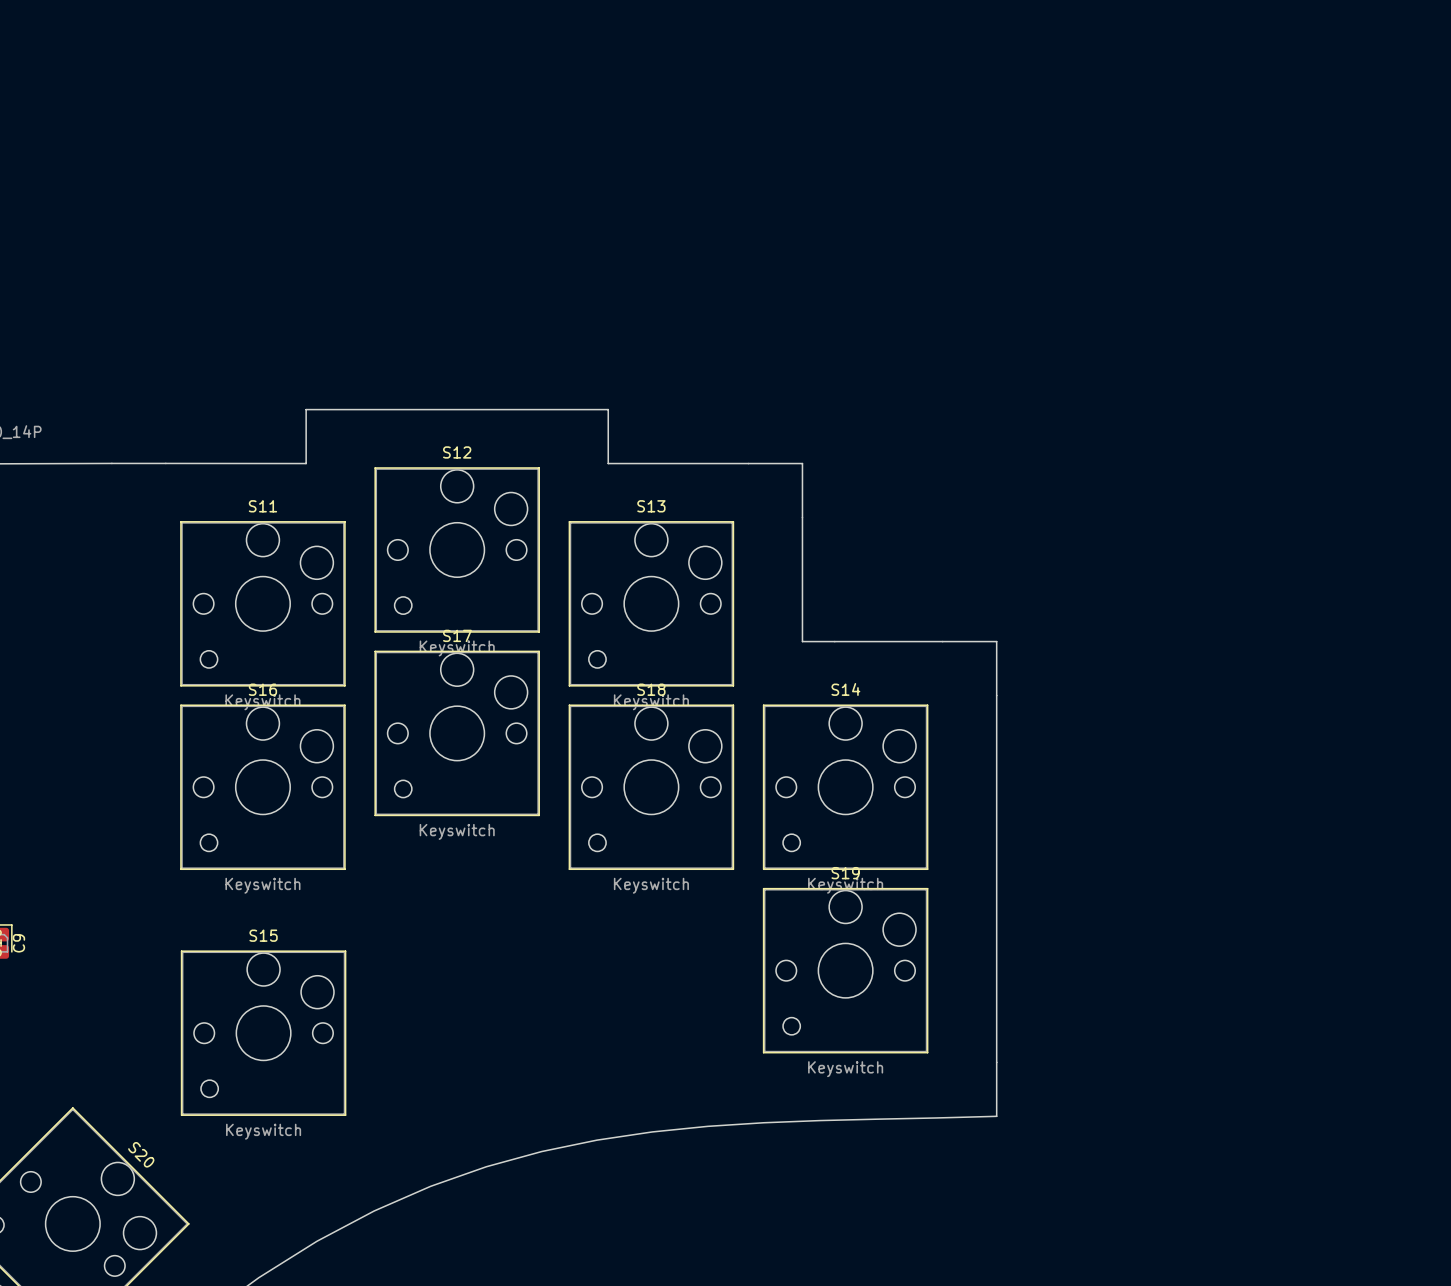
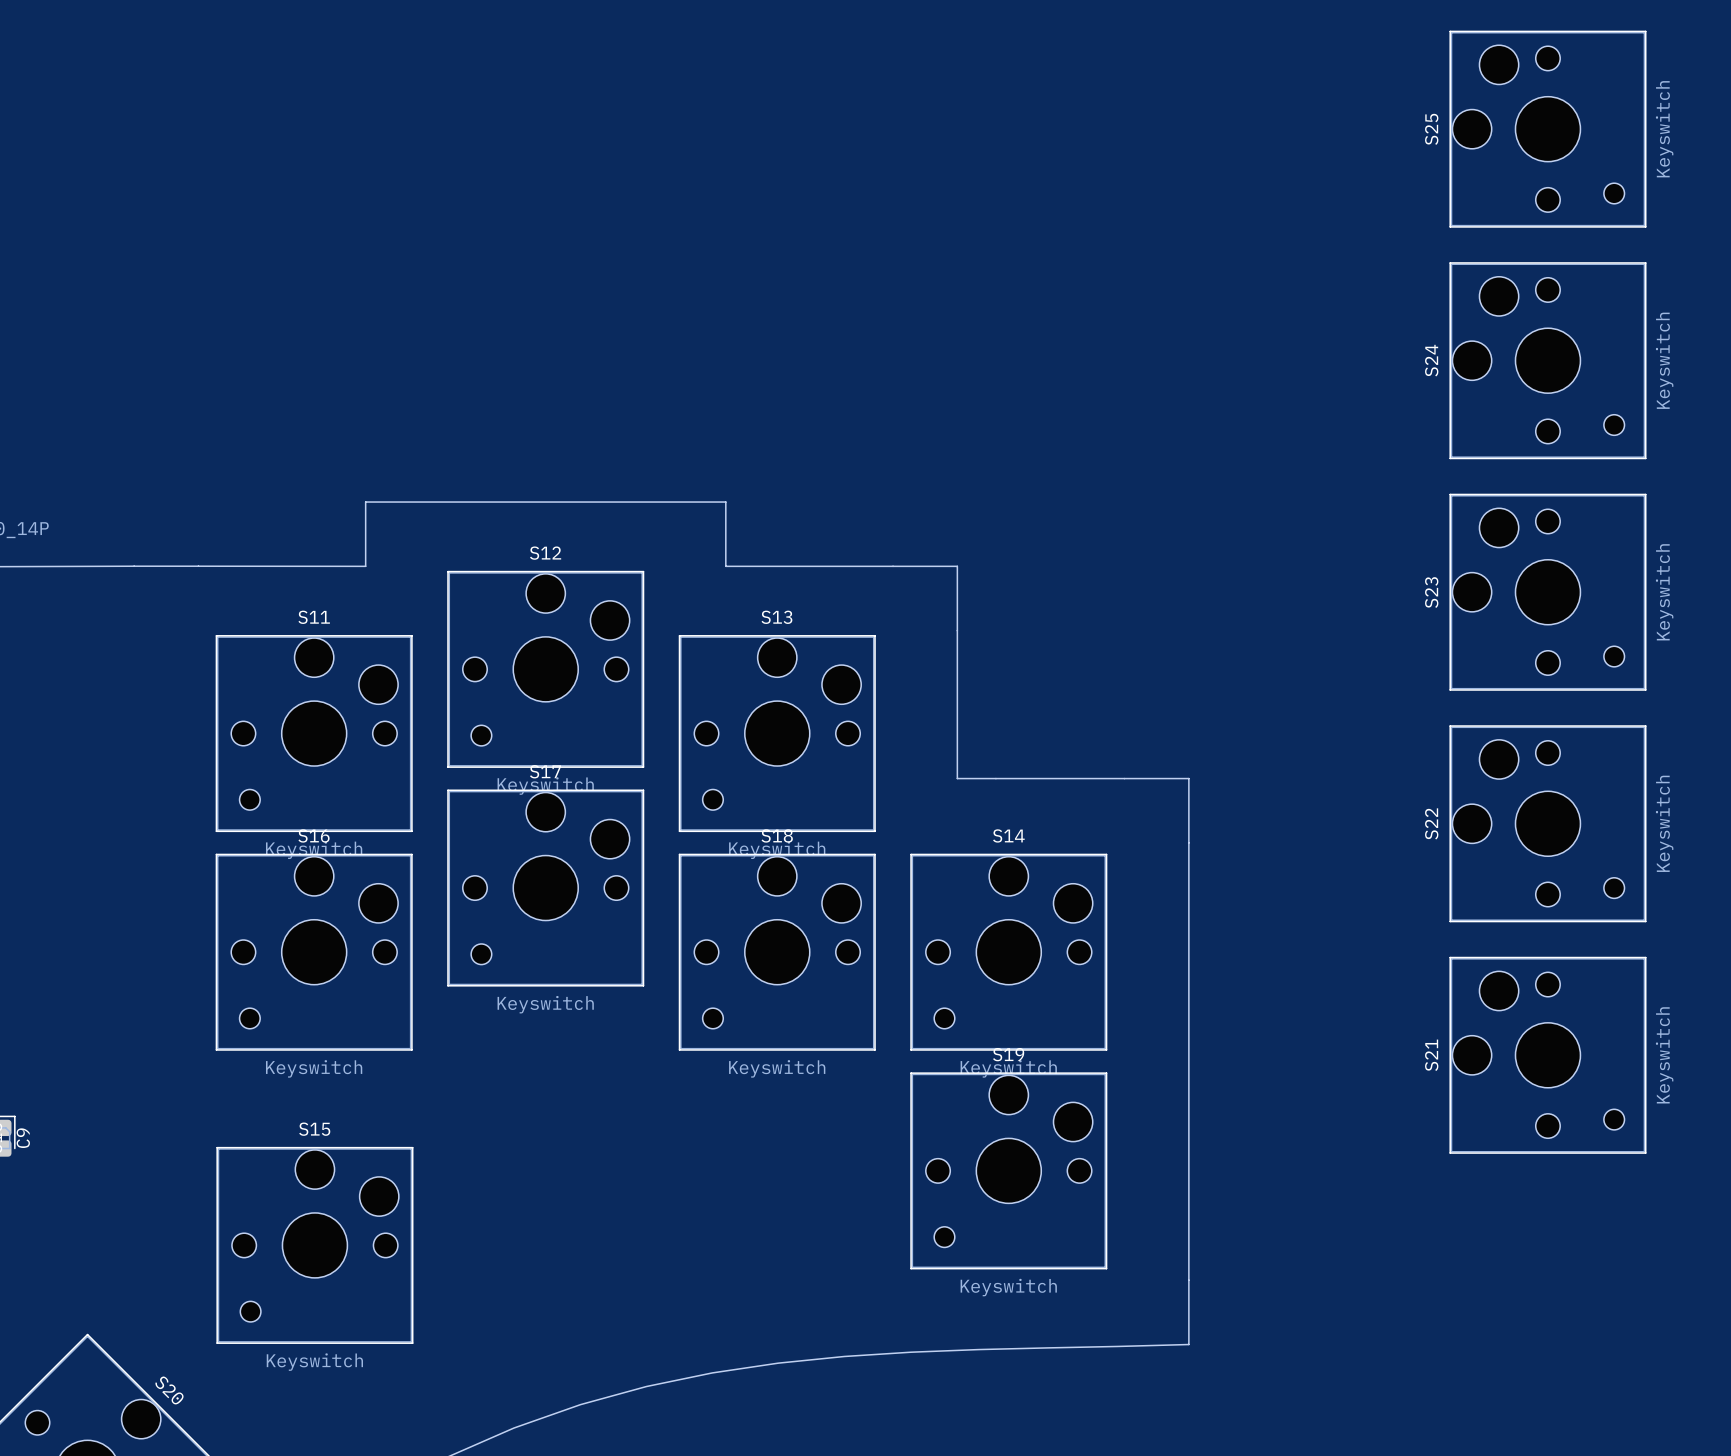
S25: none -> Keyswitch (1547, 129)
S24: none -> Keyswitch (1547, 360)
S23: none -> Keyswitch (1547, 592)
S22: none -> Keyswitch (1547, 823)
S21: none -> Keyswitch (1547, 1055)

